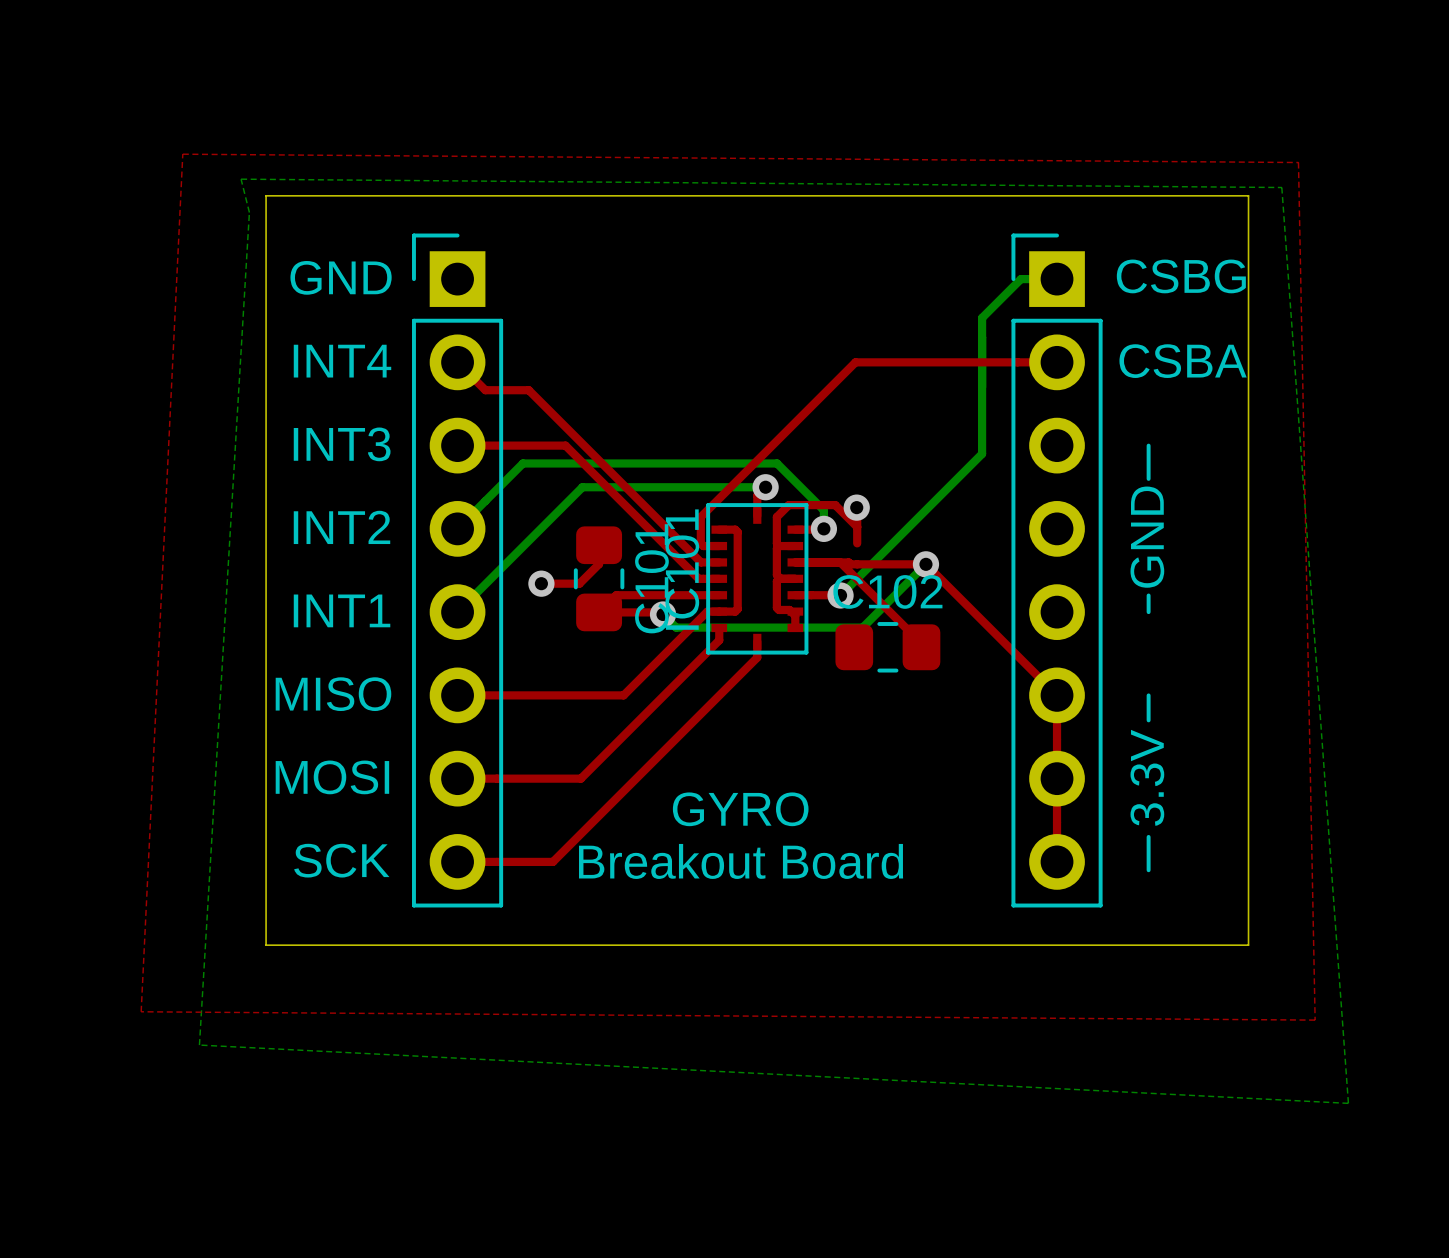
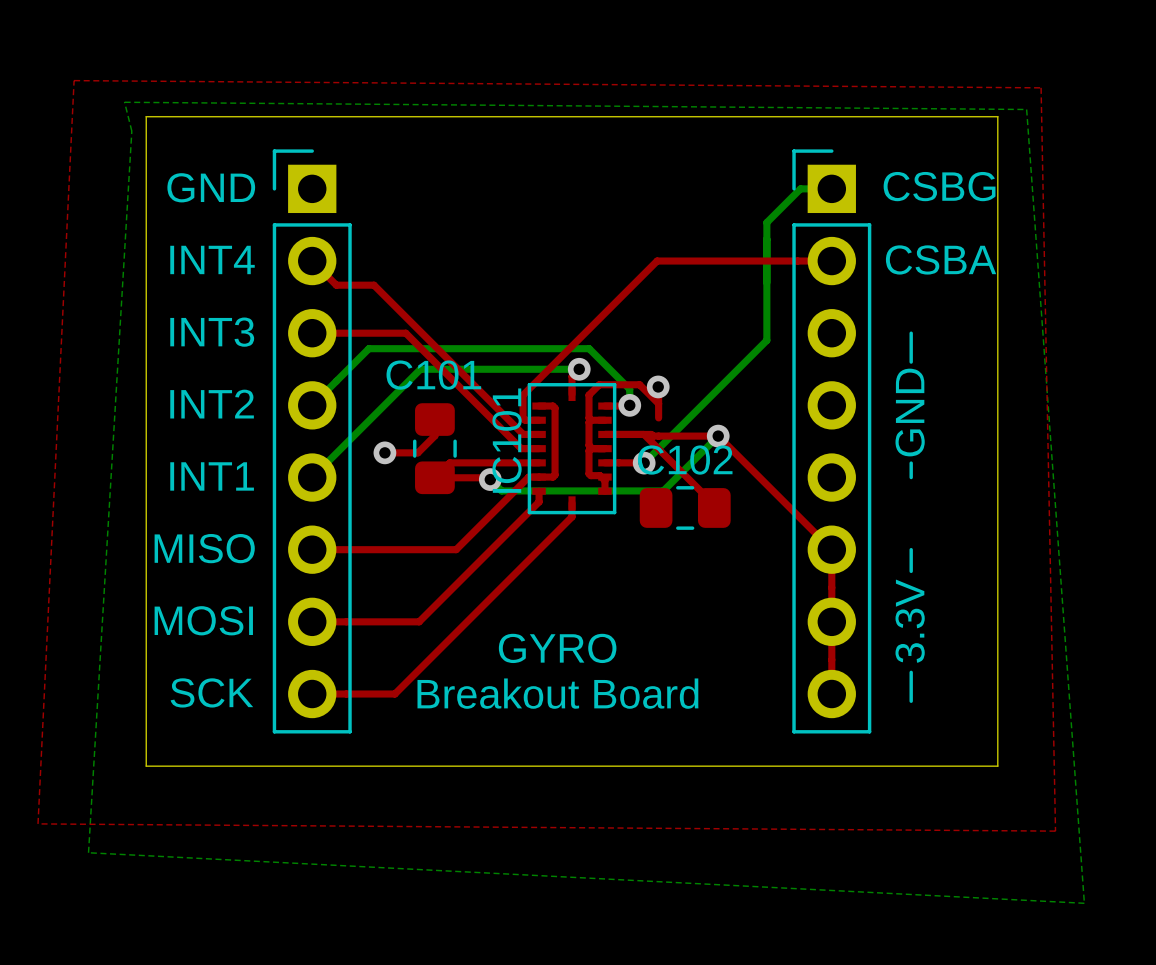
C101 name rotation: 0° (651, 578) -> 90° clockwise (433, 375)

